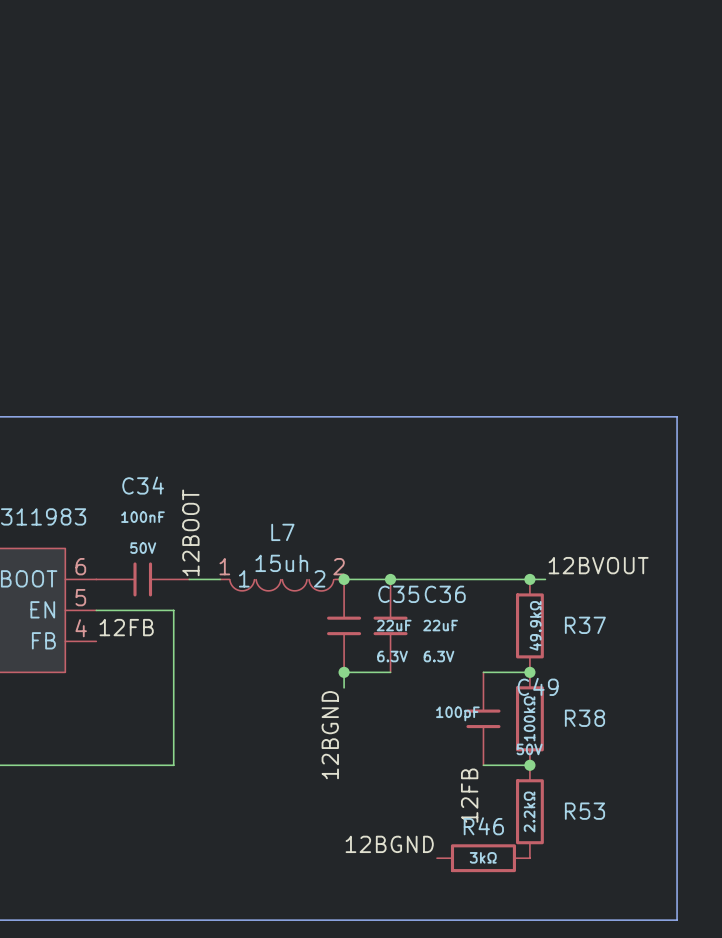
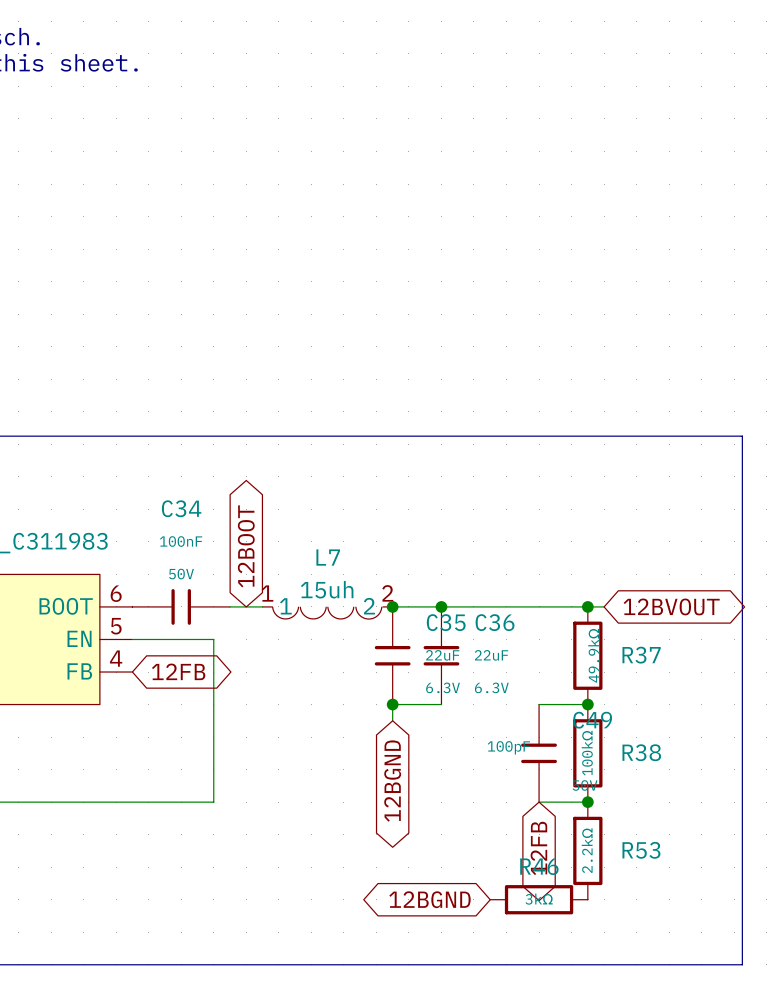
global label: none -> 12BOOT (246, 546)
label: 12BOOT (190, 532) -> none
label: 12BVOUT (598, 565) -> none
global label: none -> 12BVOUT (671, 606)
label: 12FB (126, 627) -> none
global label: none -> 12FB (178, 671)
label: 12BGND (330, 735) -> none
global label: none -> 12BGND (392, 781)
label: 12FB (469, 795) -> none
global label: none -> 12FB (538, 848)
label: 12BGND (389, 844) -> none
global label: none -> 12BGND (429, 899)

